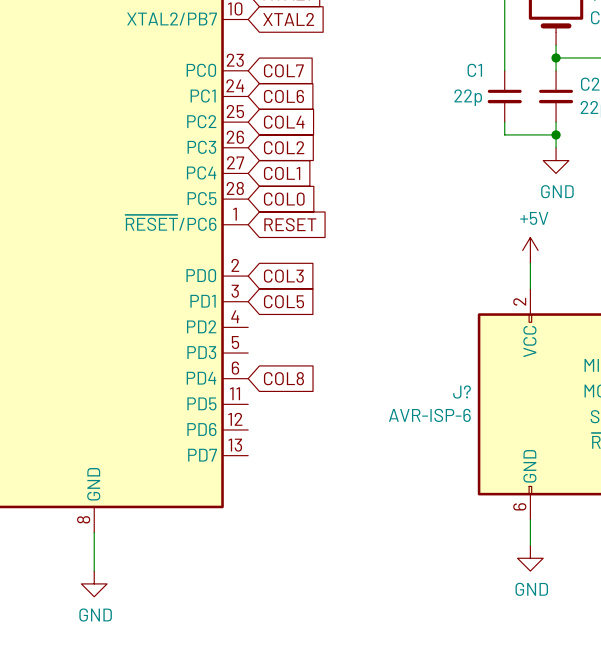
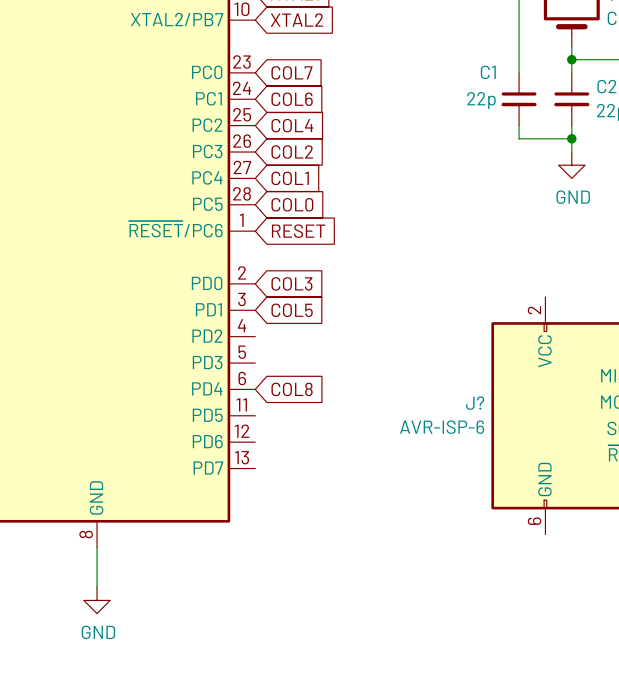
power symbol: +5V (530, 250) -> none
wire: (530, 263) (530, 288) -> none
wire: (530, 519) (530, 545) -> none
power symbol: GND (530, 558) -> none

